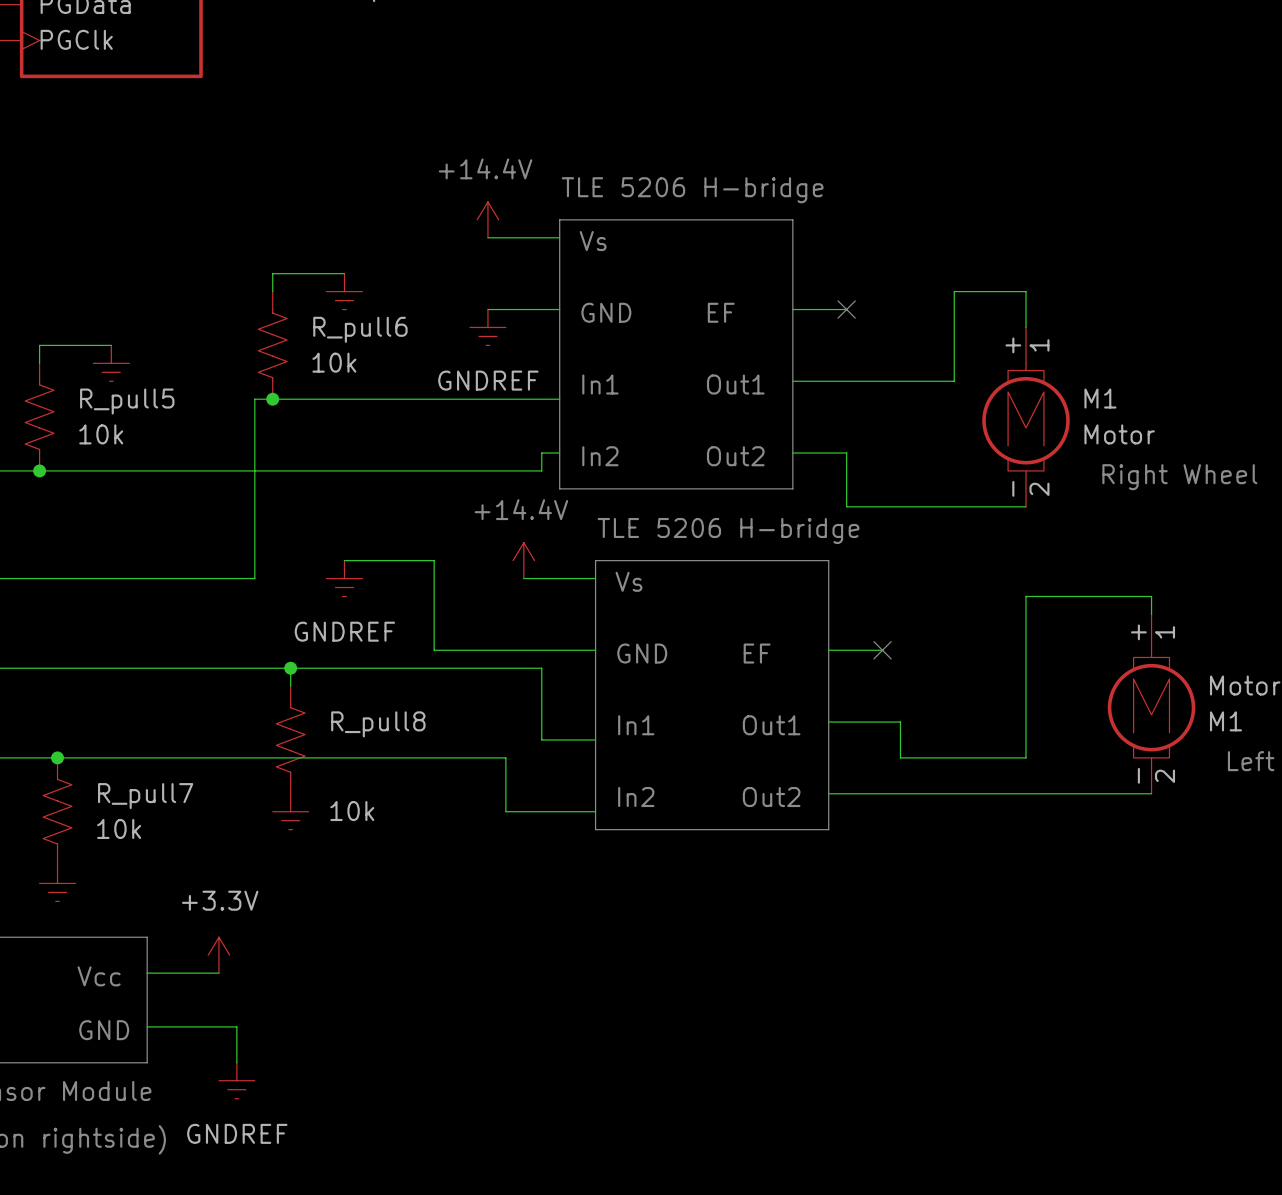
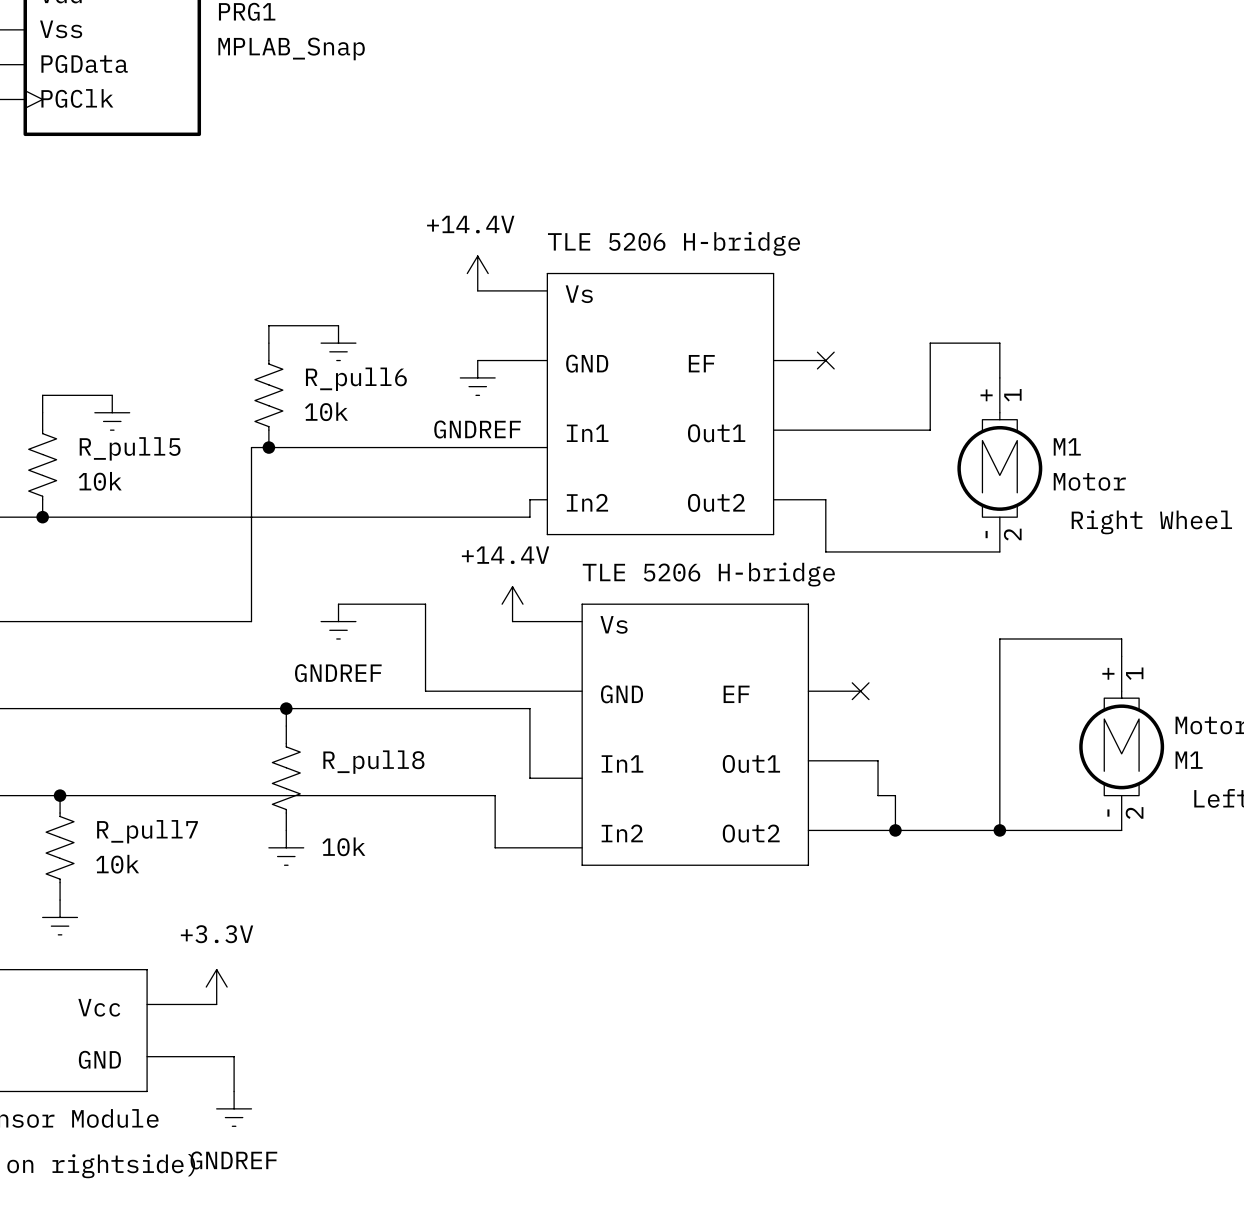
wire: (918, 757) (1026, 757) -> (895, 795) (895, 830)
wire: none -> (999, 795) (999, 830)
junction: none -> (895, 830)
junction: none -> (999, 830)

